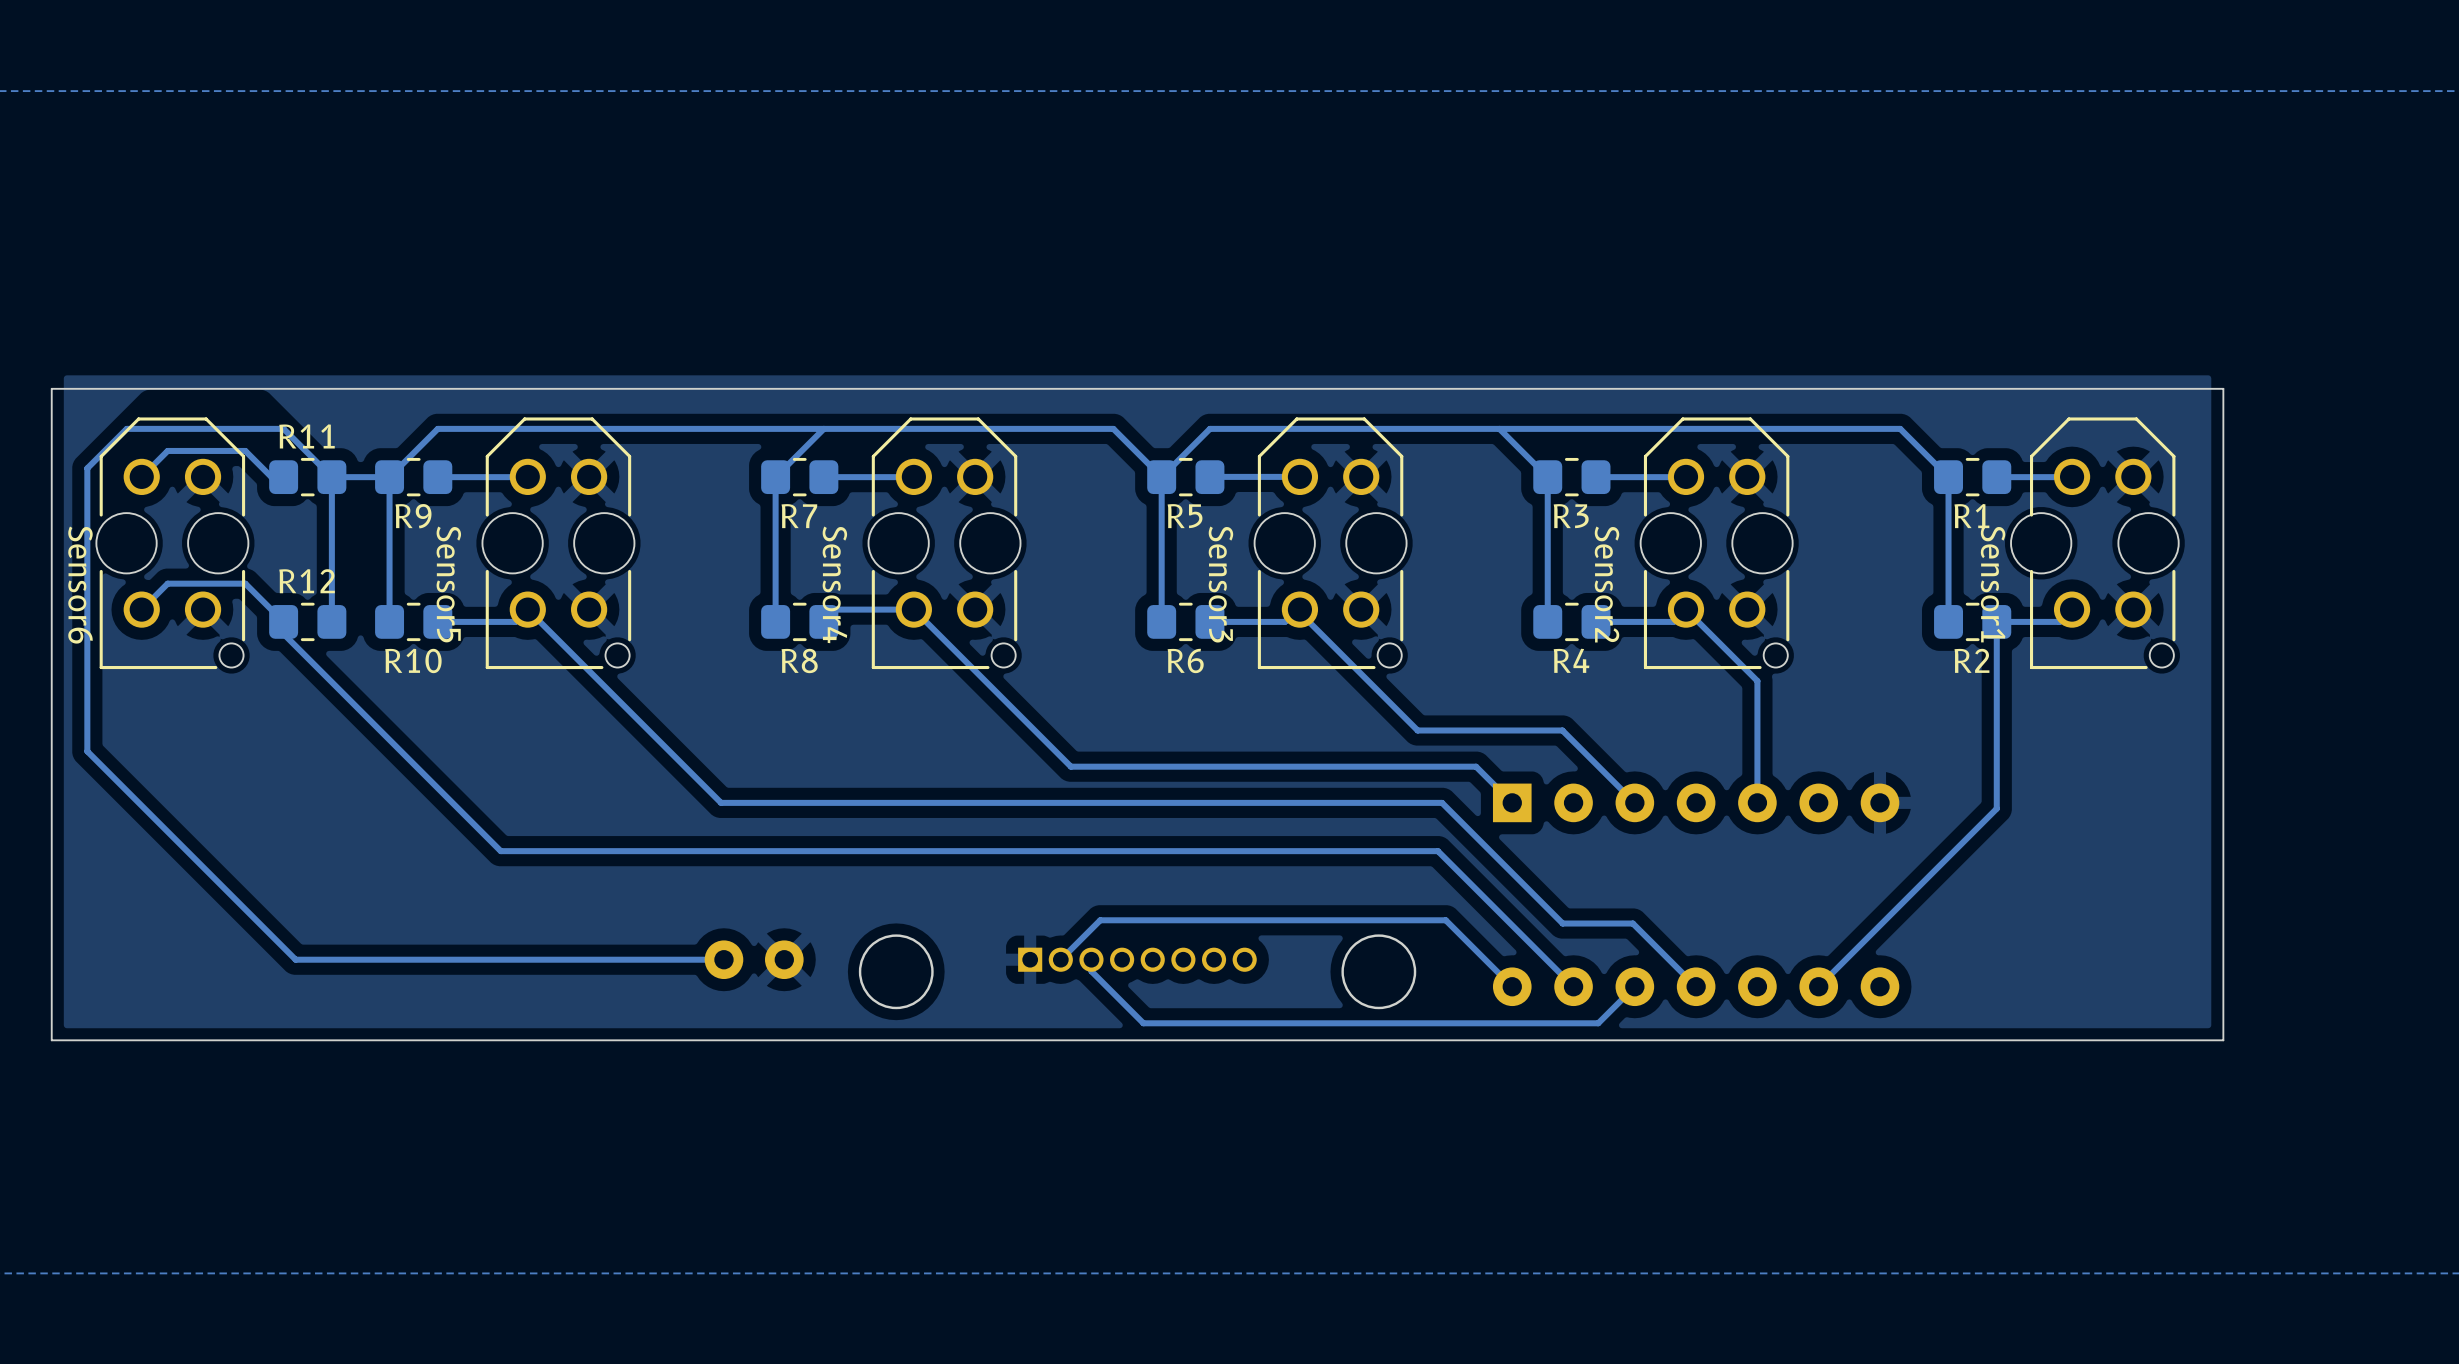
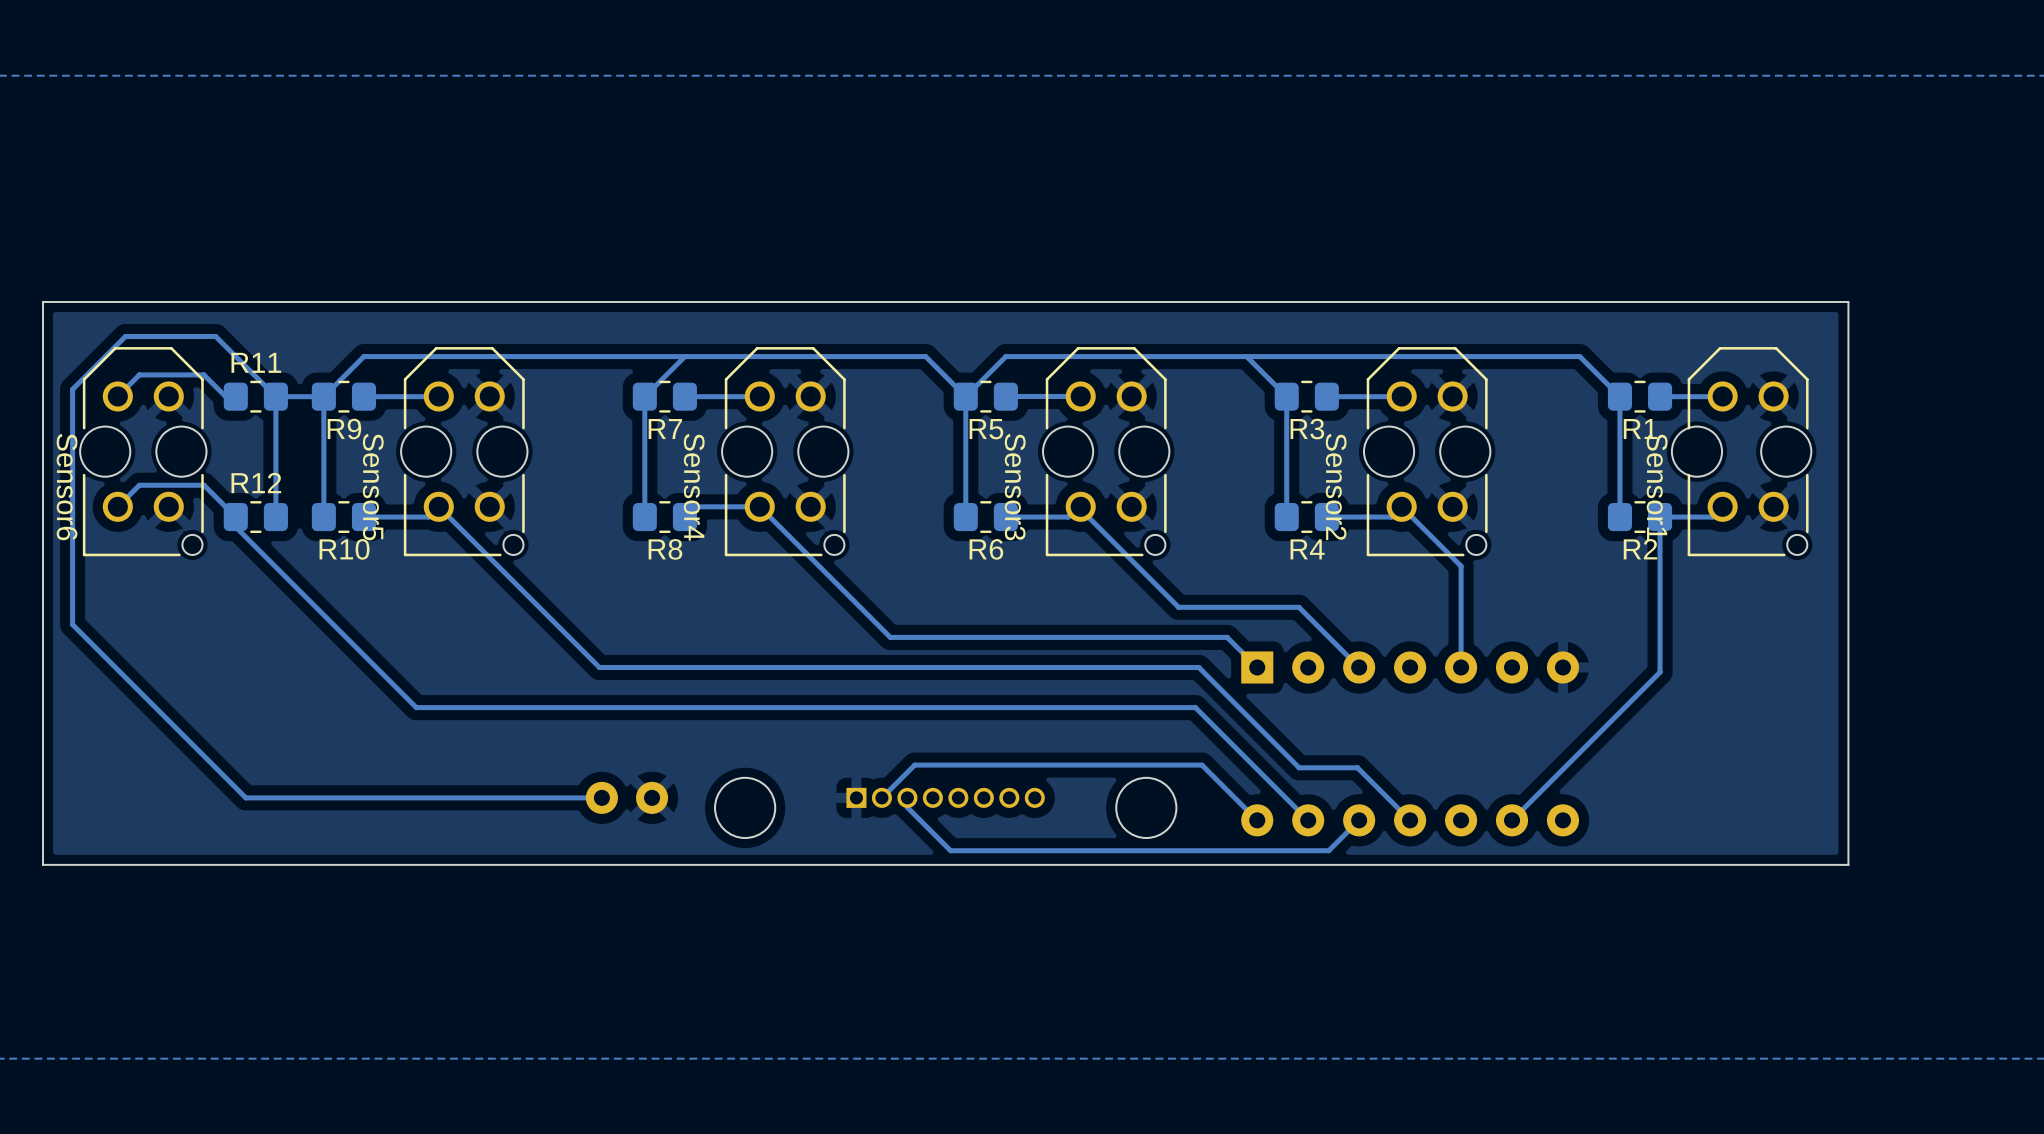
board edge: (2223, 388) (51, 388) -> (1848, 323) (1848, 302) (43, 302) (43, 323)
track: (283, 428) (126, 428) -> (235, 356) (215, 336) (125, 336) (105, 356)

